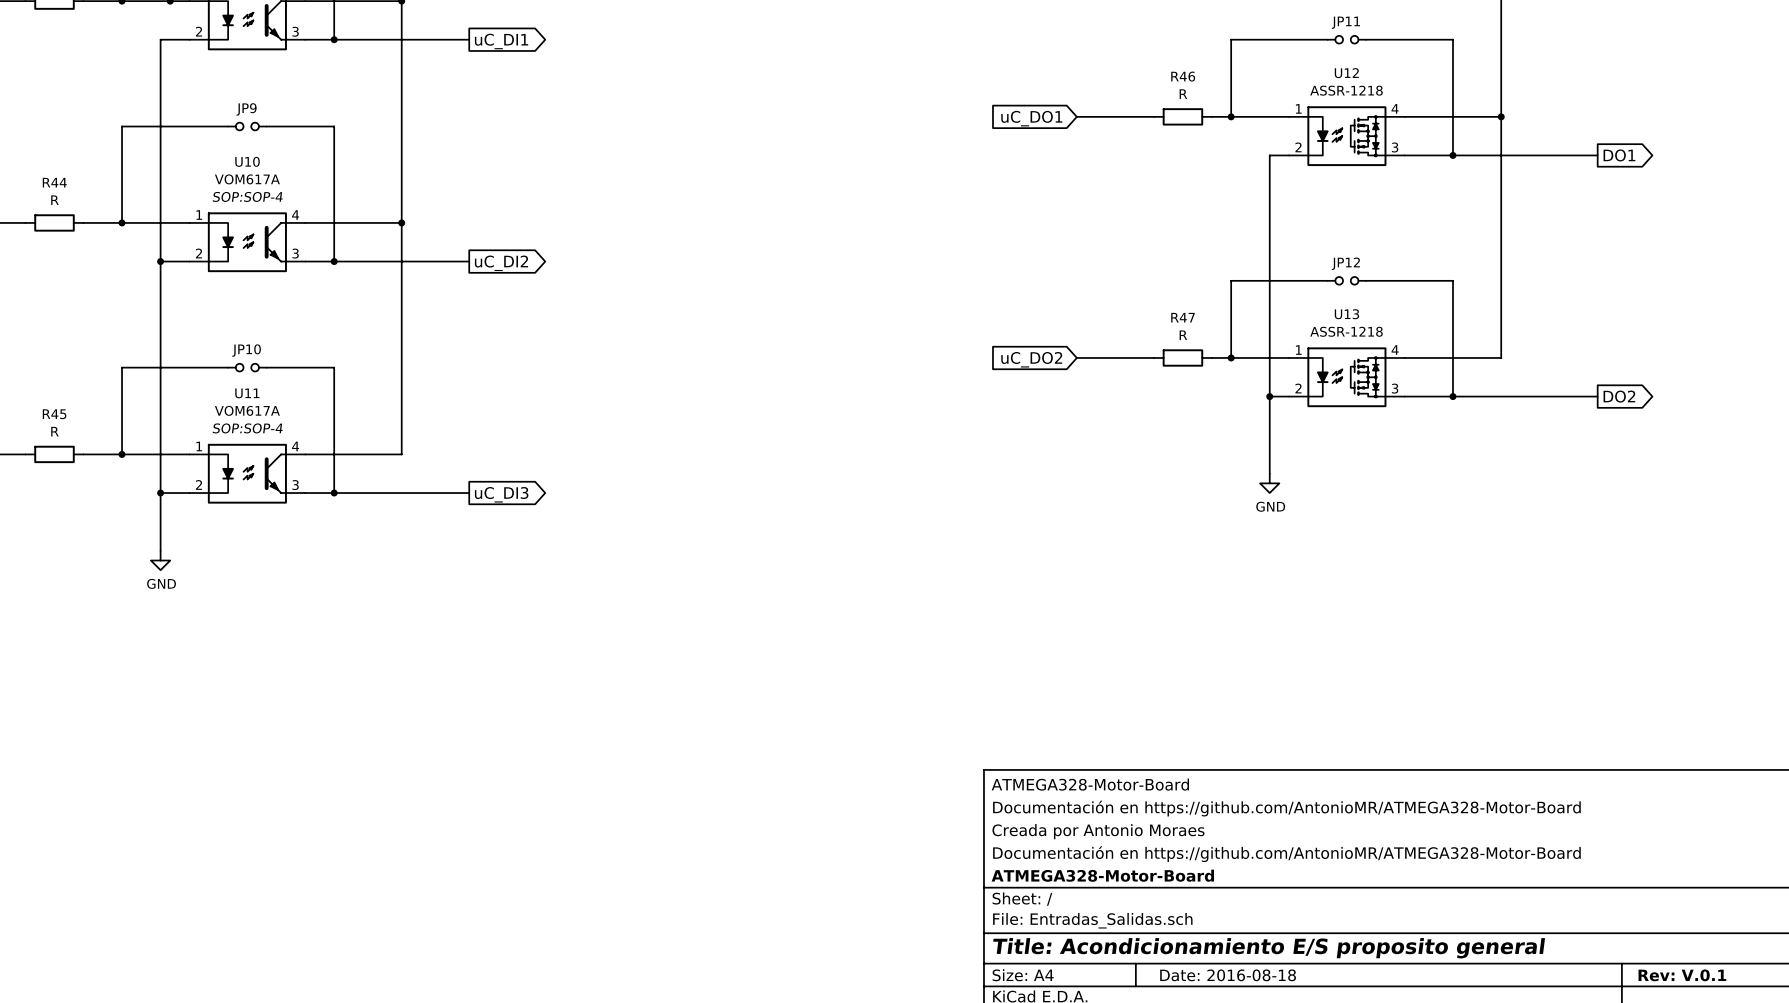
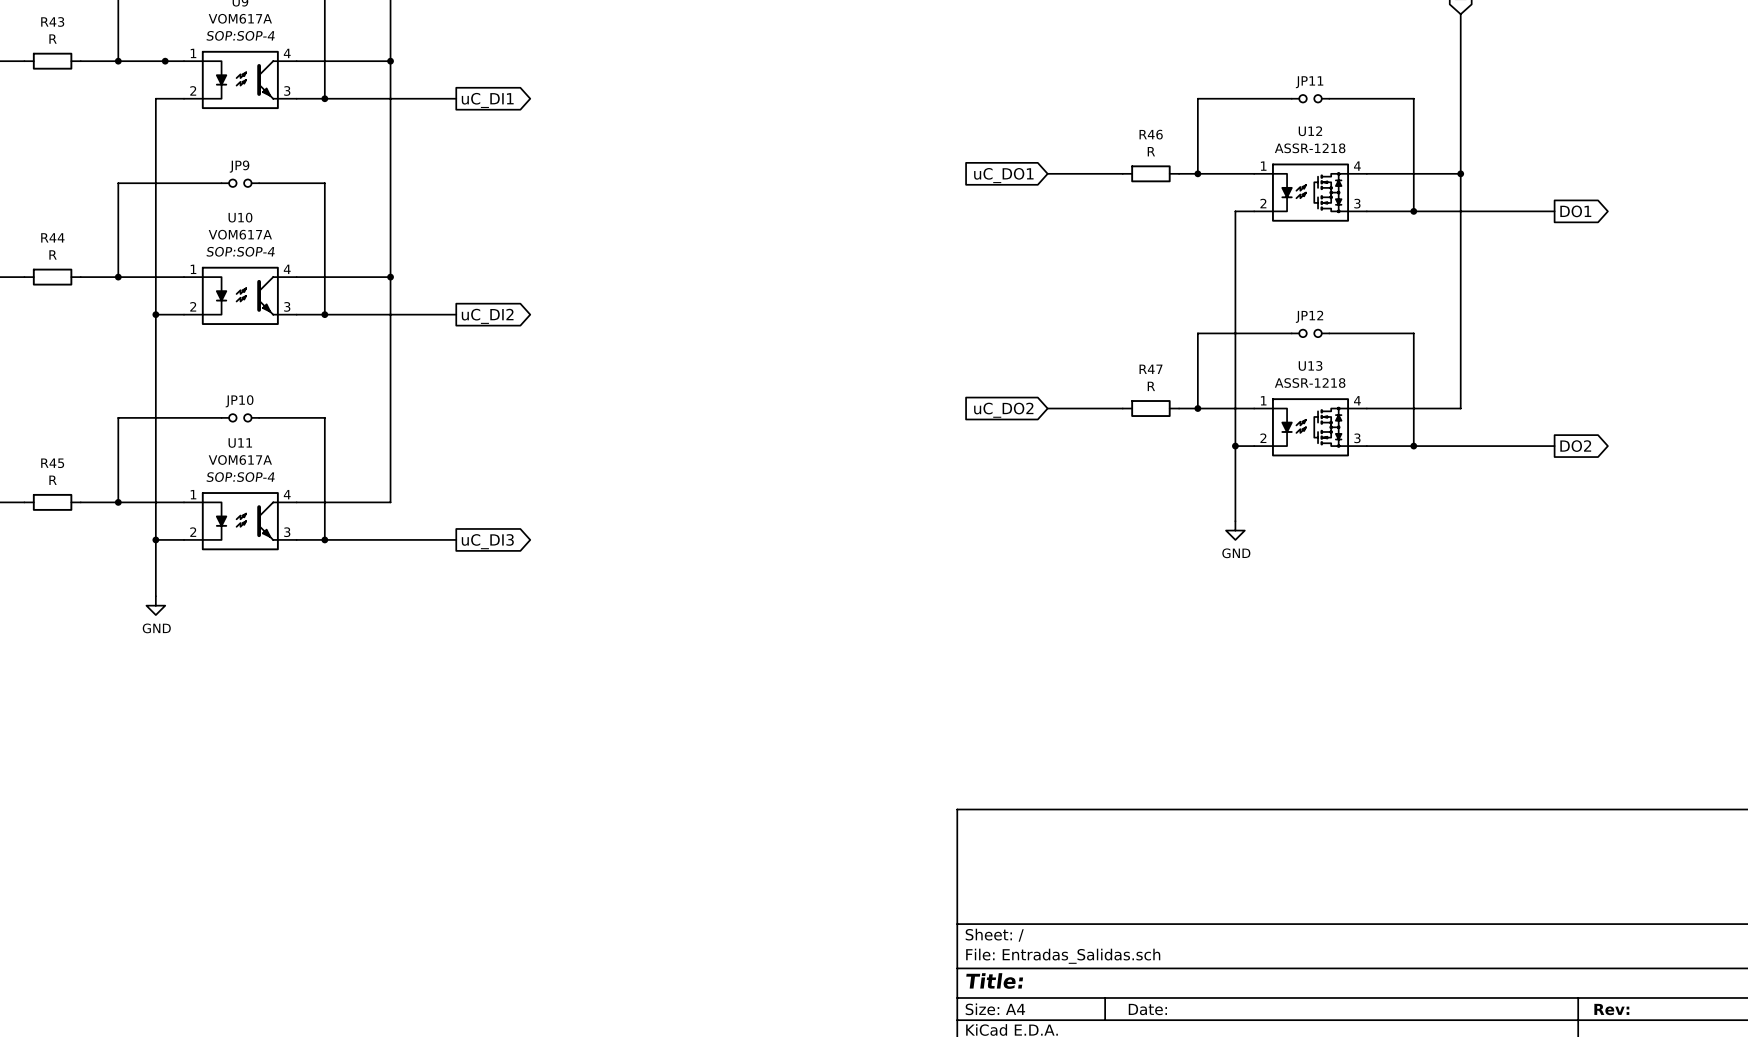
title block: ATMEGA328-Motor-Board (1090, 784) -> none
title block: Documentación en https://github.com/AntonioMR/ATMEGA328-Motor-Board (1286, 808) -> none
title block: Creada por Antonio Moraes (1098, 831) -> none
title block: Documentación en https://github.com/AntonioMR/ATMEGA328-Motor-Board (1286, 854) -> none
title block: ATMEGA328-Motor-Board (1102, 875) -> none
title block: Title: Acondicionamiento E/S proposito general (1269, 948) -> Title: (994, 981)
title block: Date: 2016-08-18 (1228, 975) -> Date: (1147, 1009)
title block: Rev: V.0.1 (1682, 975) -> Rev: (1611, 1009)

